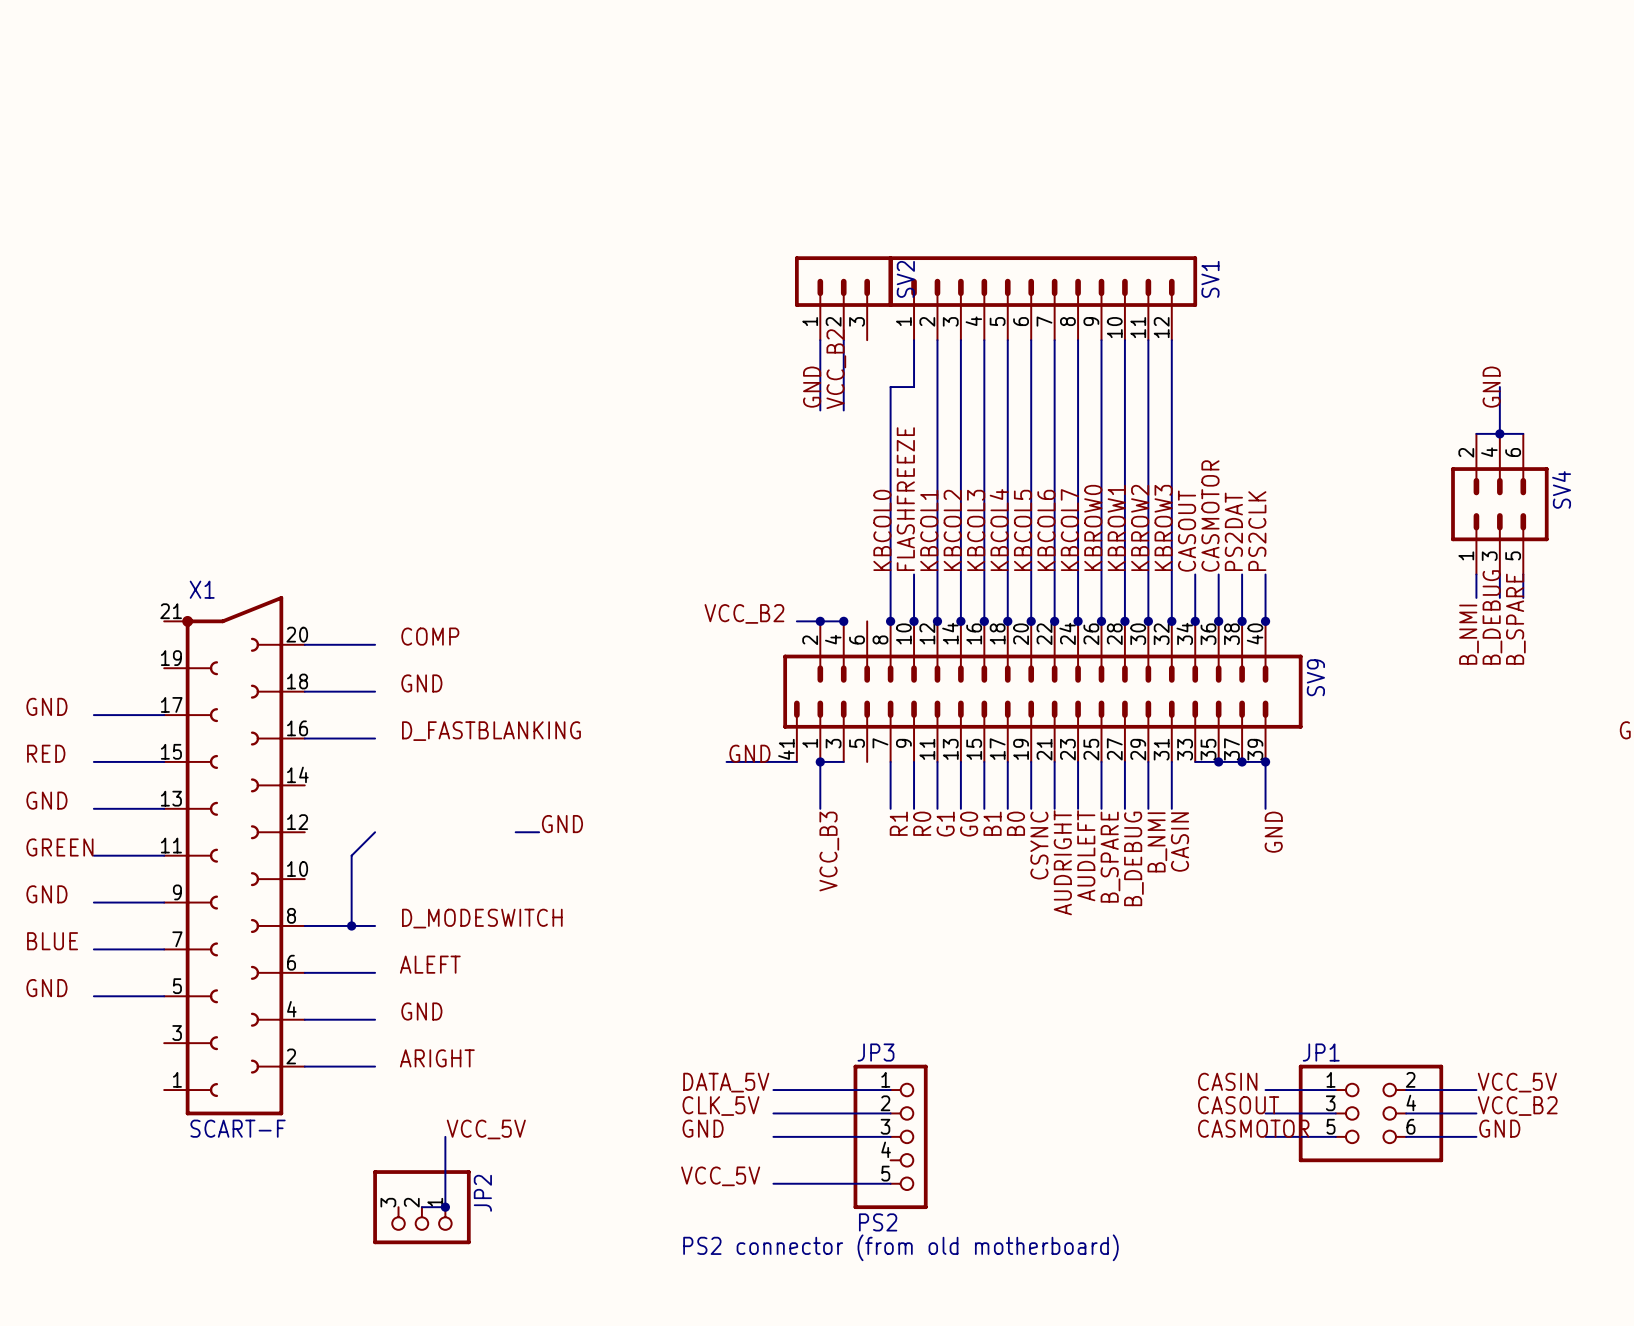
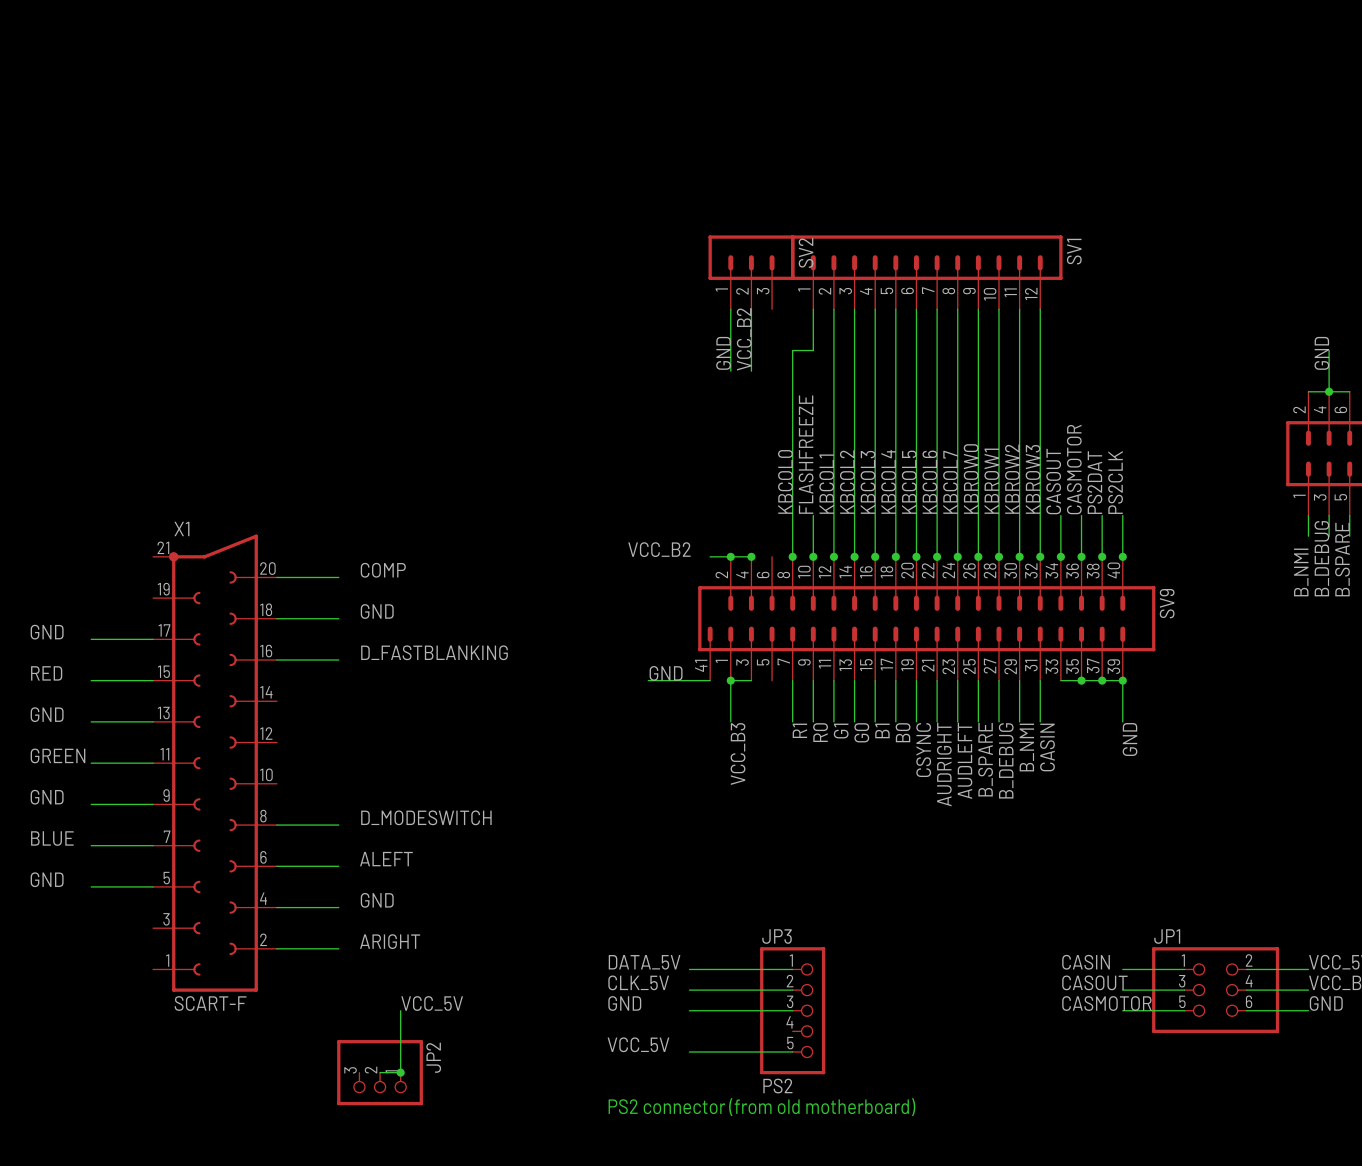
label: GND (562, 824) -> none
wire: (375, 832) (351, 855) (351, 925) -> none
wire: (515, 832) (539, 832) -> none
junction: (351, 925) -> none

